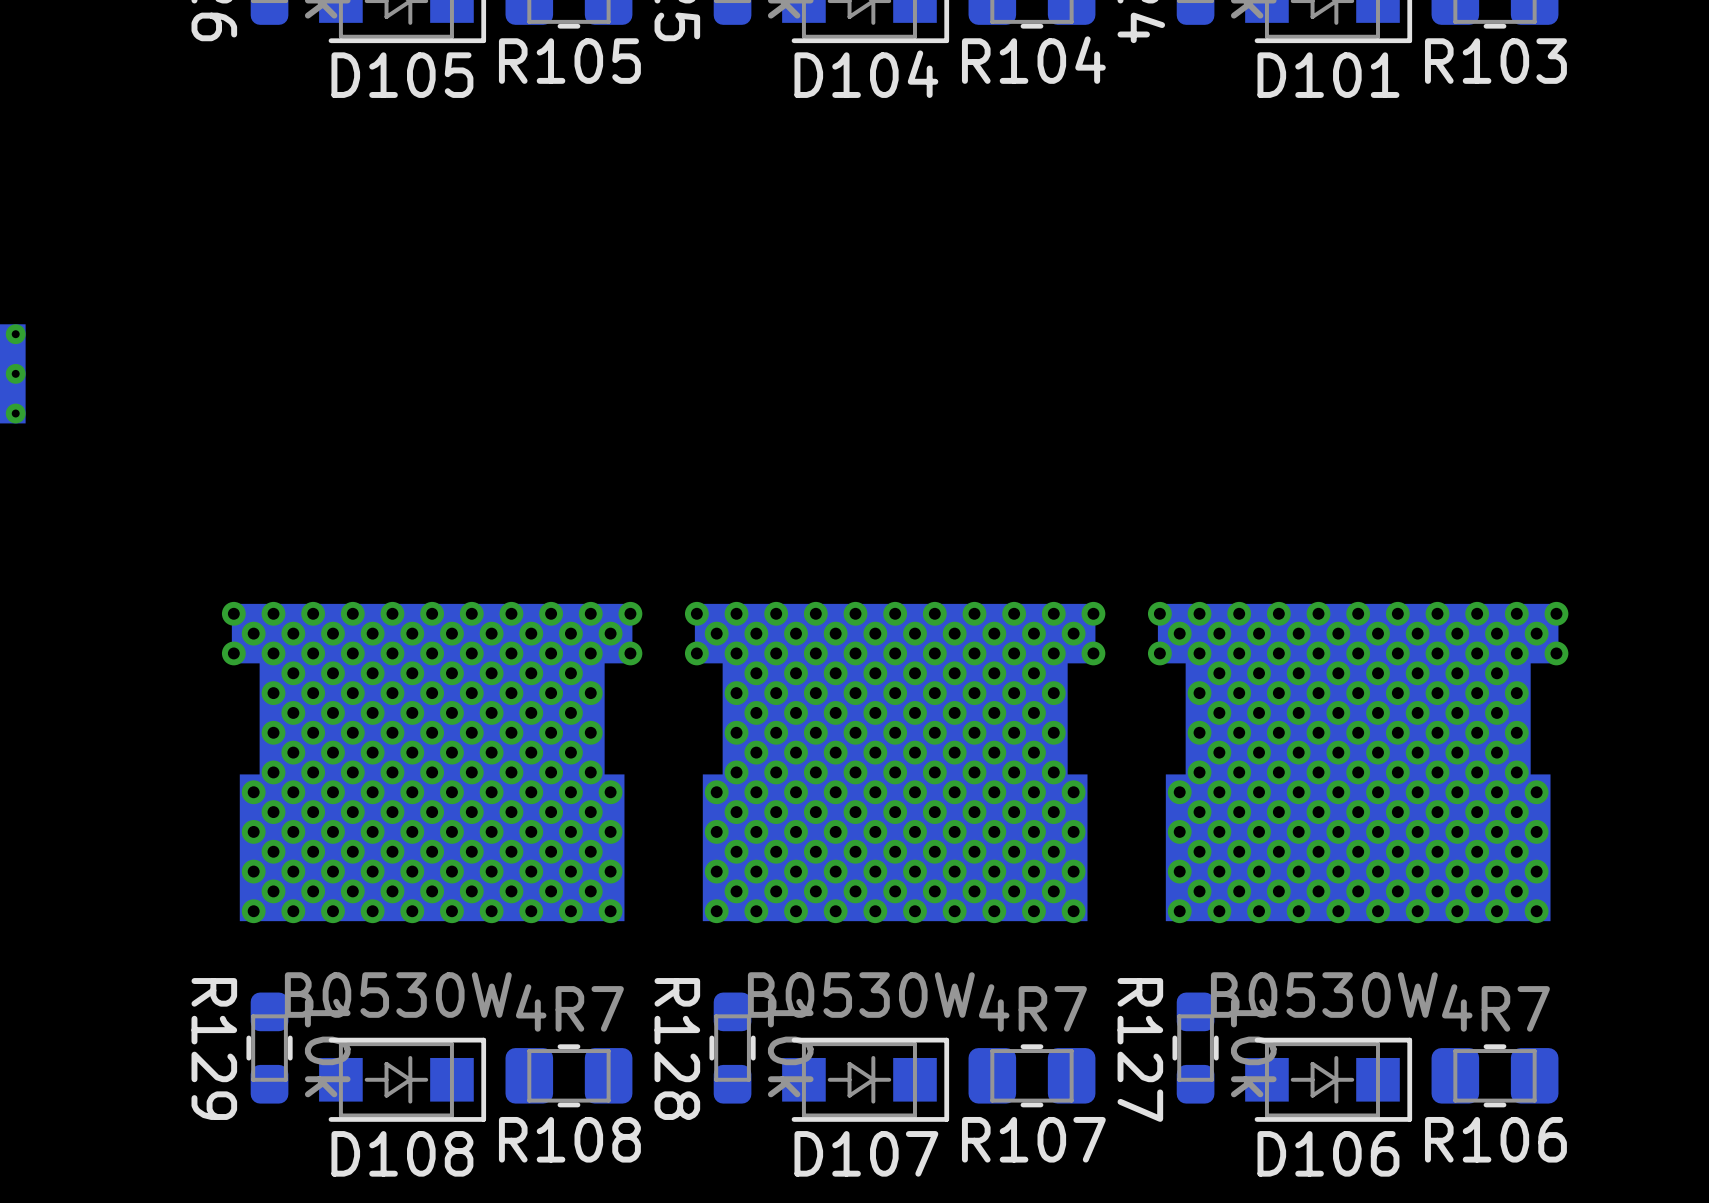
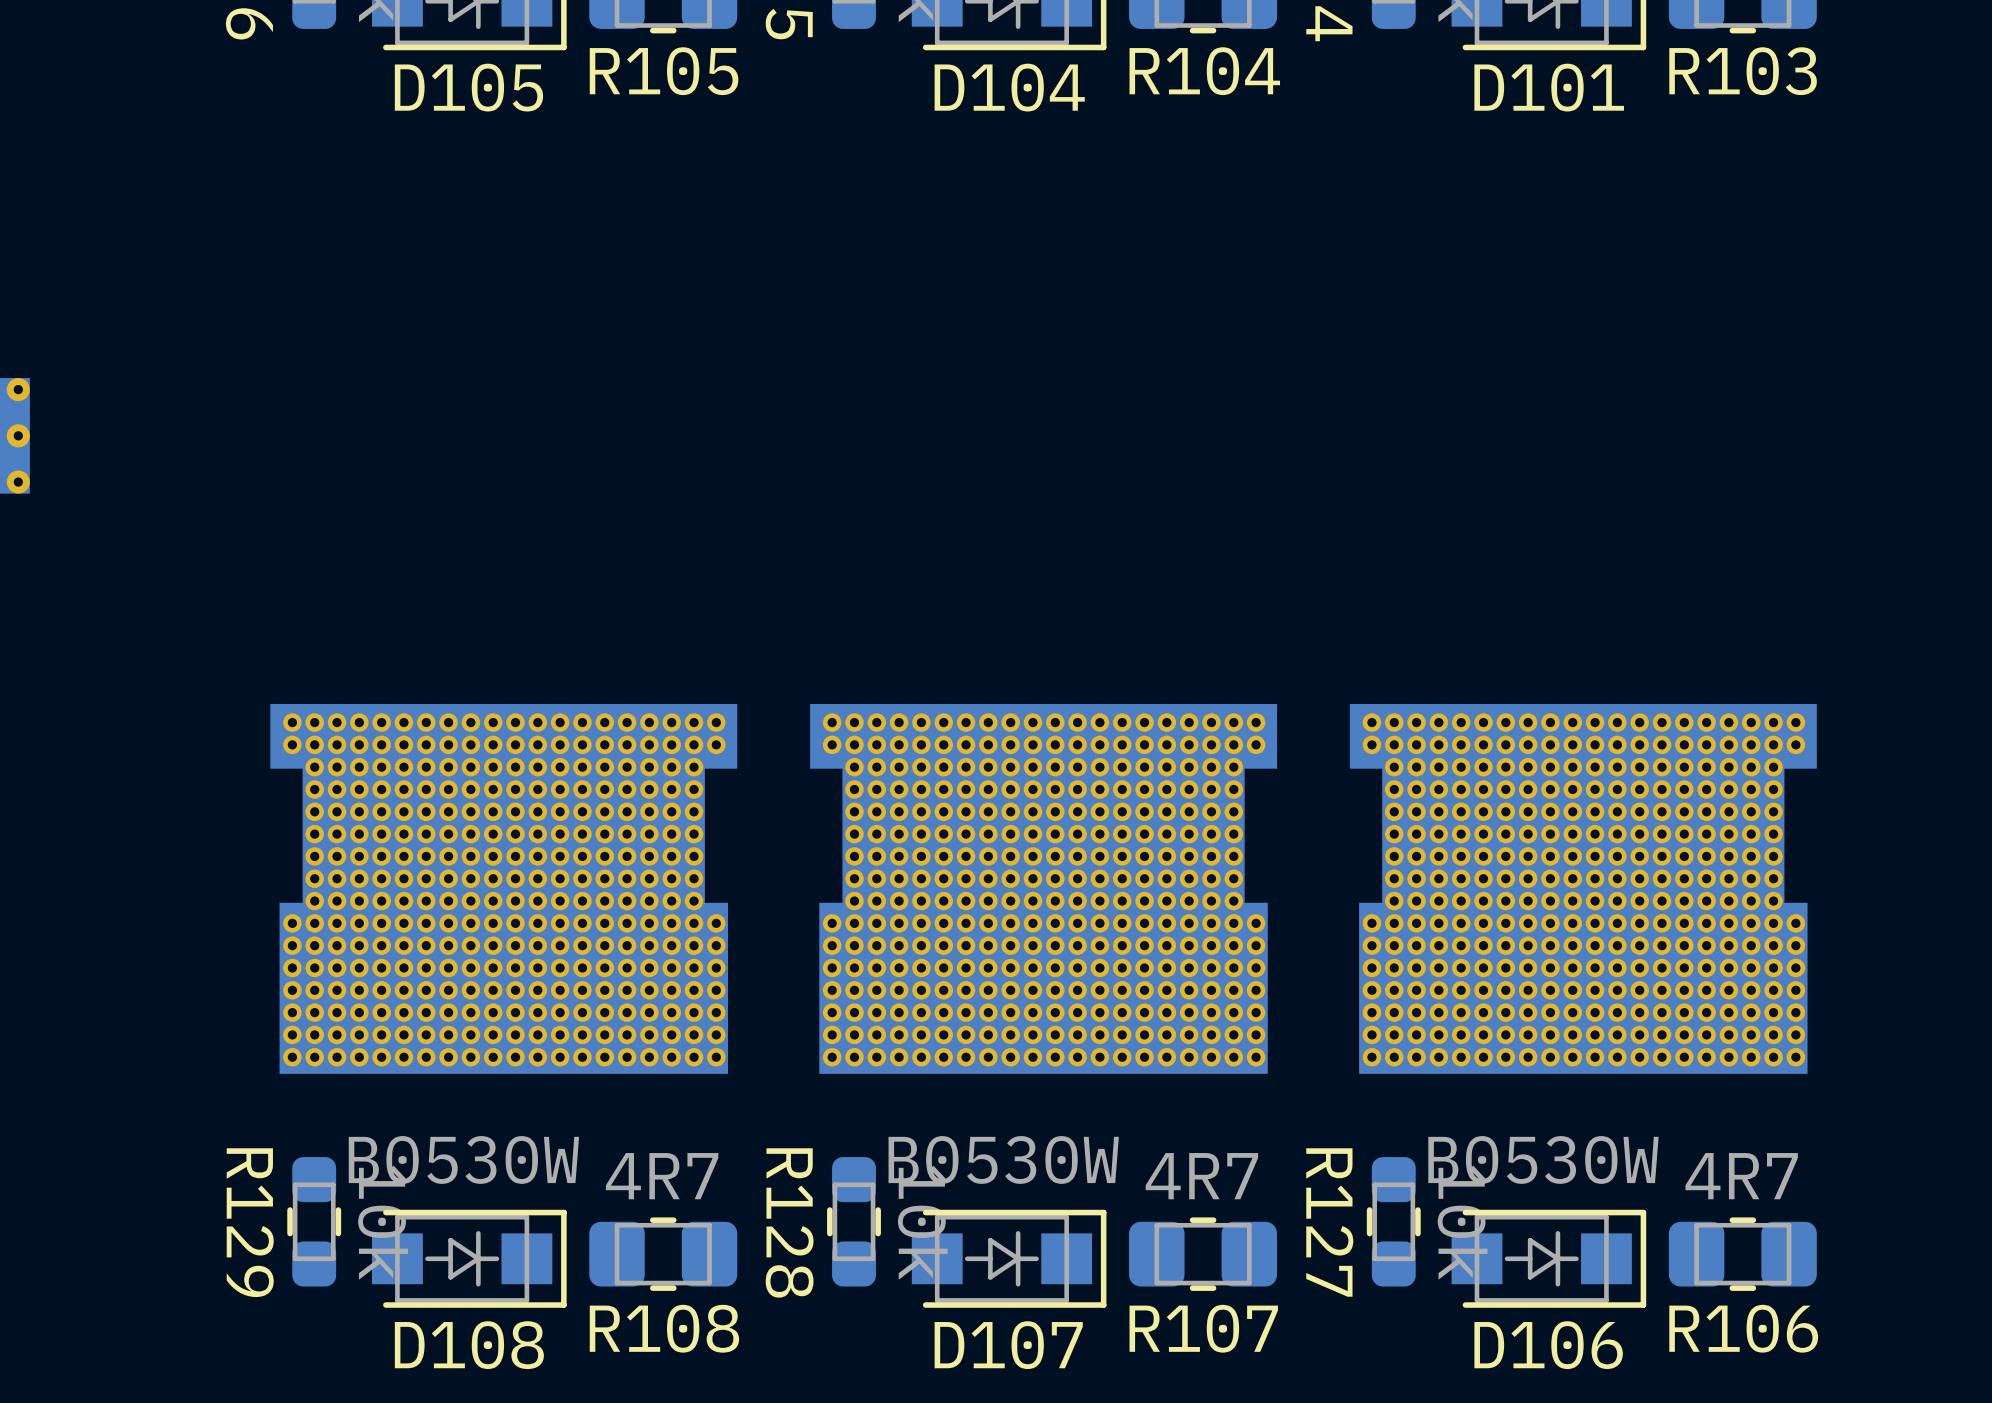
part footprint: [221, 601, 643, 924] -> [270, 703, 738, 1074]
part footprint: [684, 601, 1106, 924] -> [810, 703, 1278, 1074]
part footprint: [1147, 601, 1569, 924] -> [1349, 703, 1817, 1074]

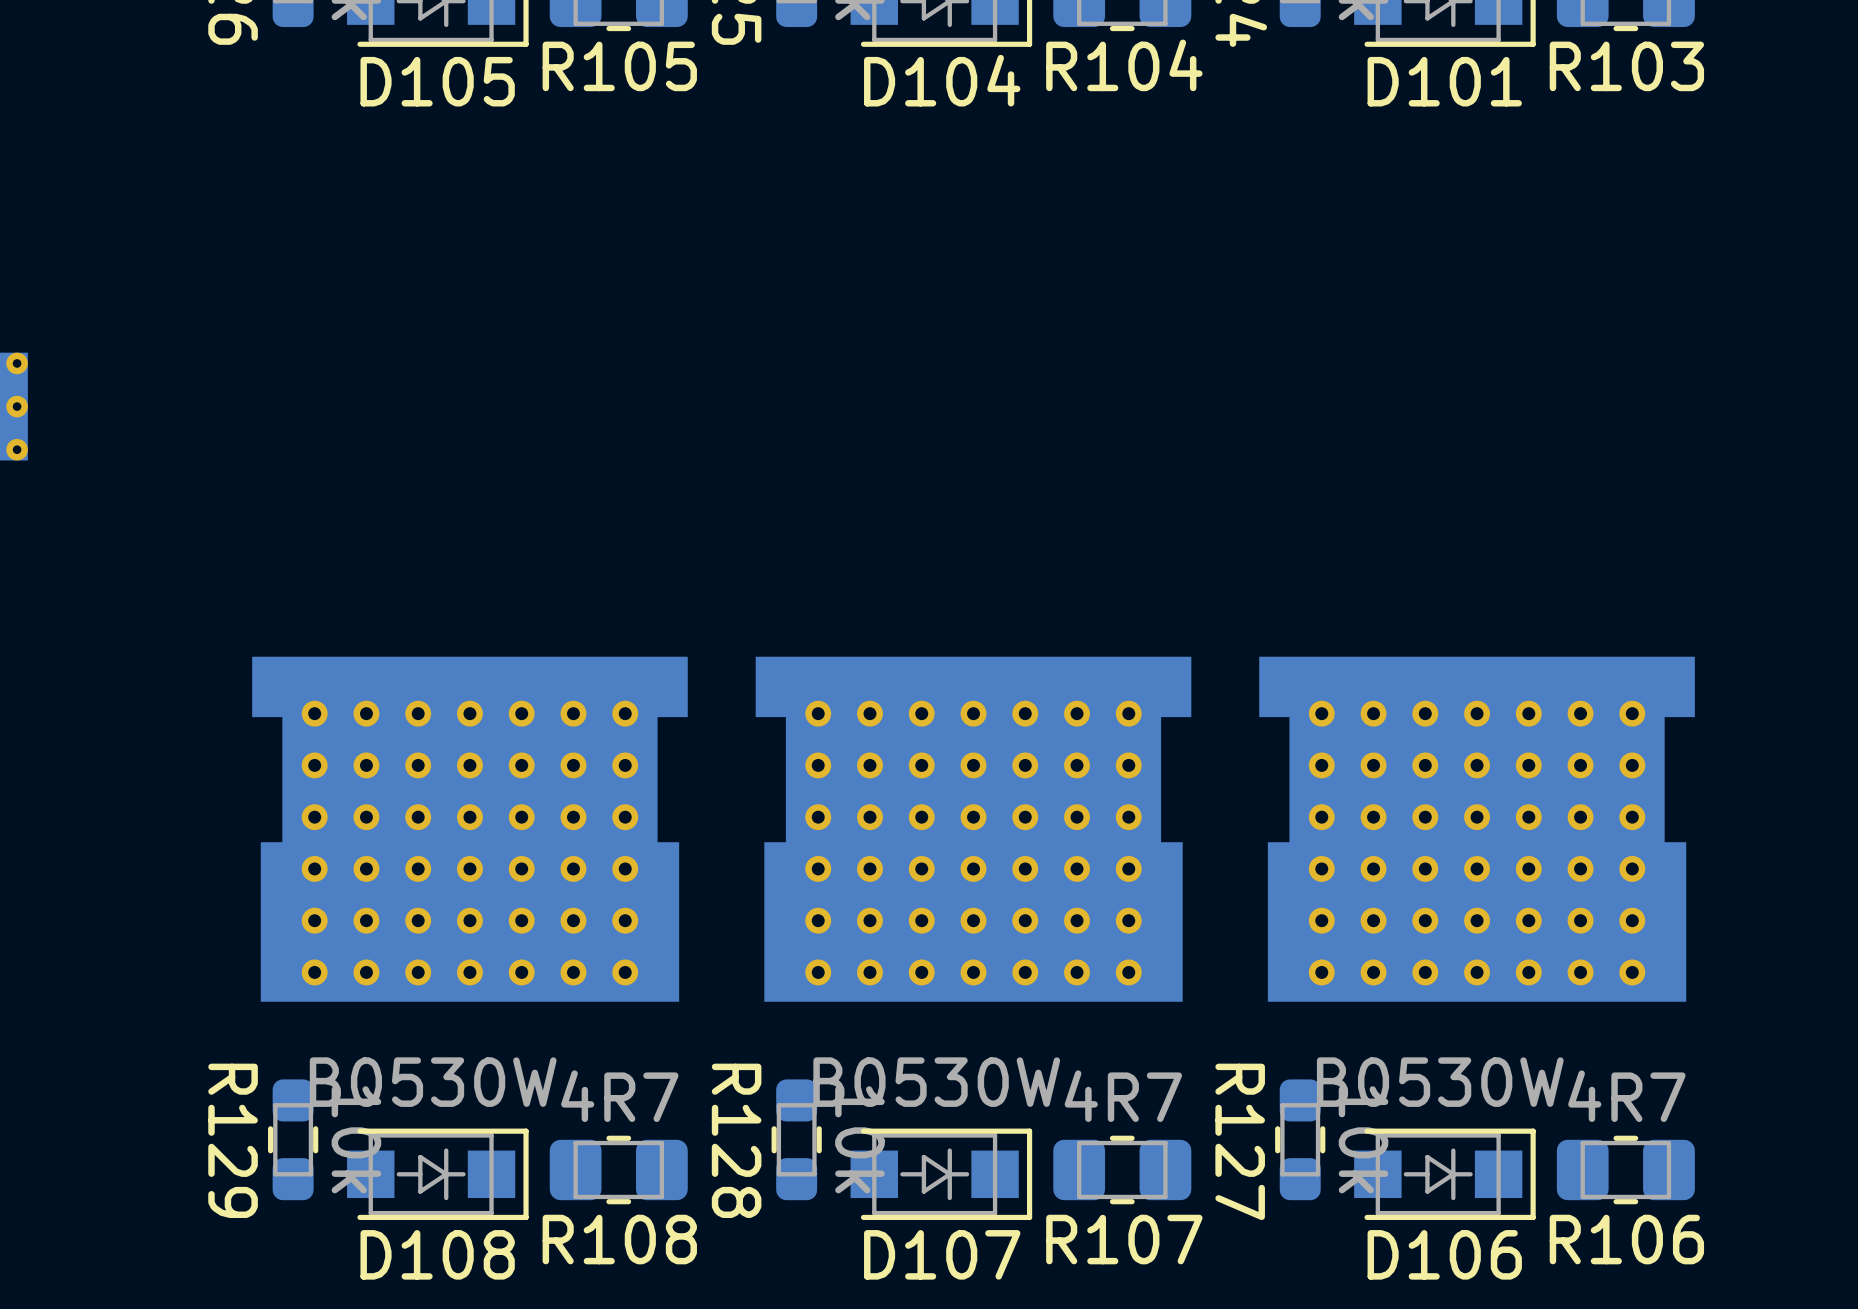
part footprint: [270, 703, 738, 1074] -> [252, 656, 688, 1002]
part footprint: [810, 703, 1278, 1074] -> [755, 656, 1192, 1002]
part footprint: [1349, 703, 1817, 1074] -> [1259, 656, 1695, 1002]

